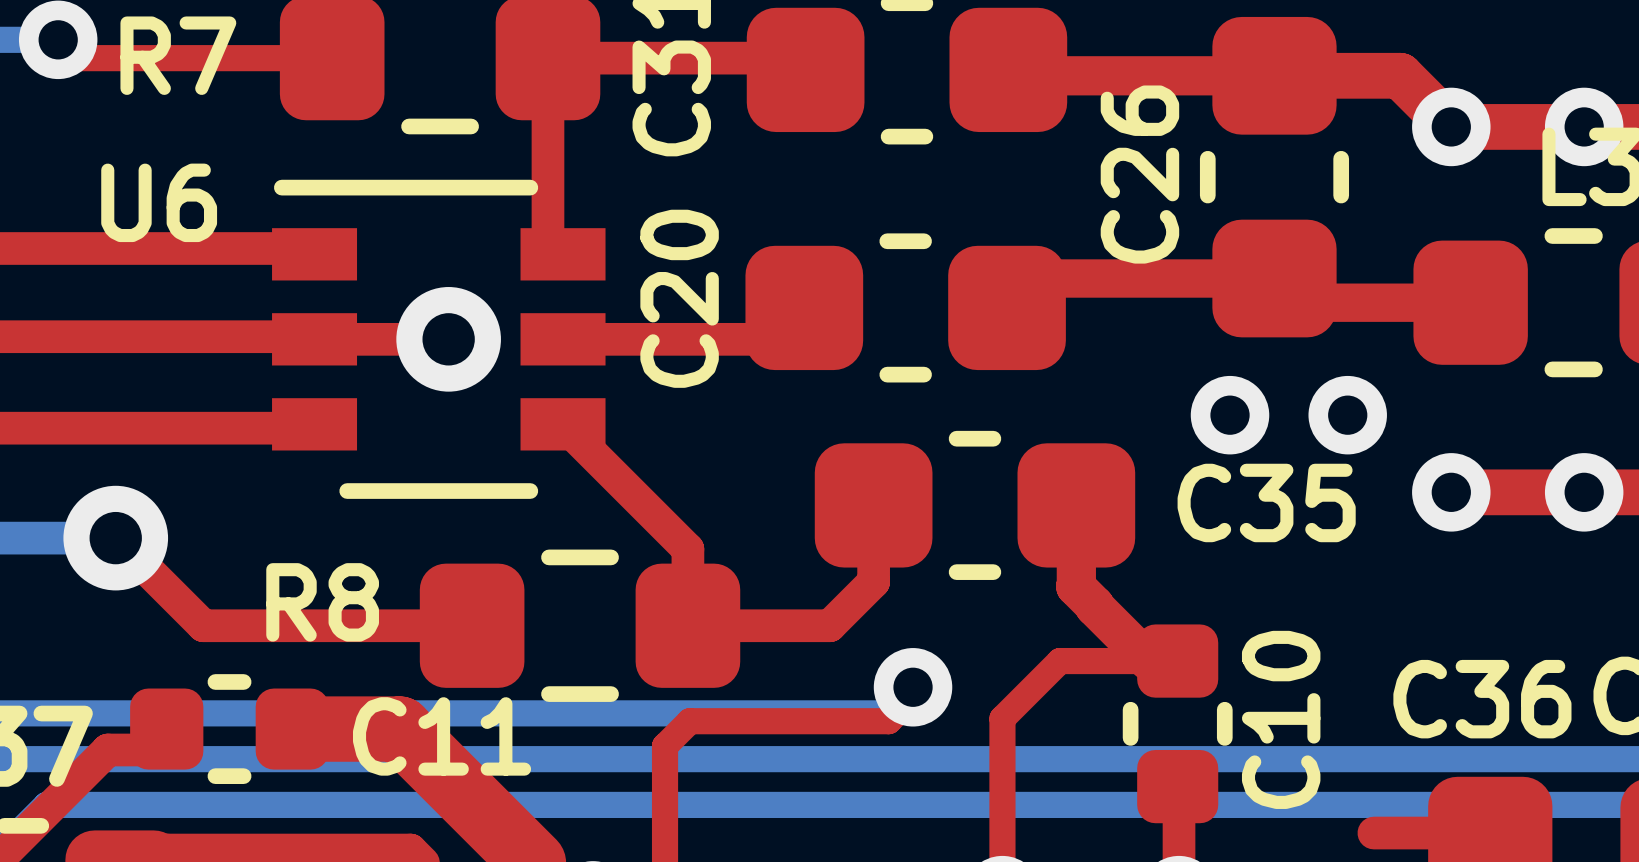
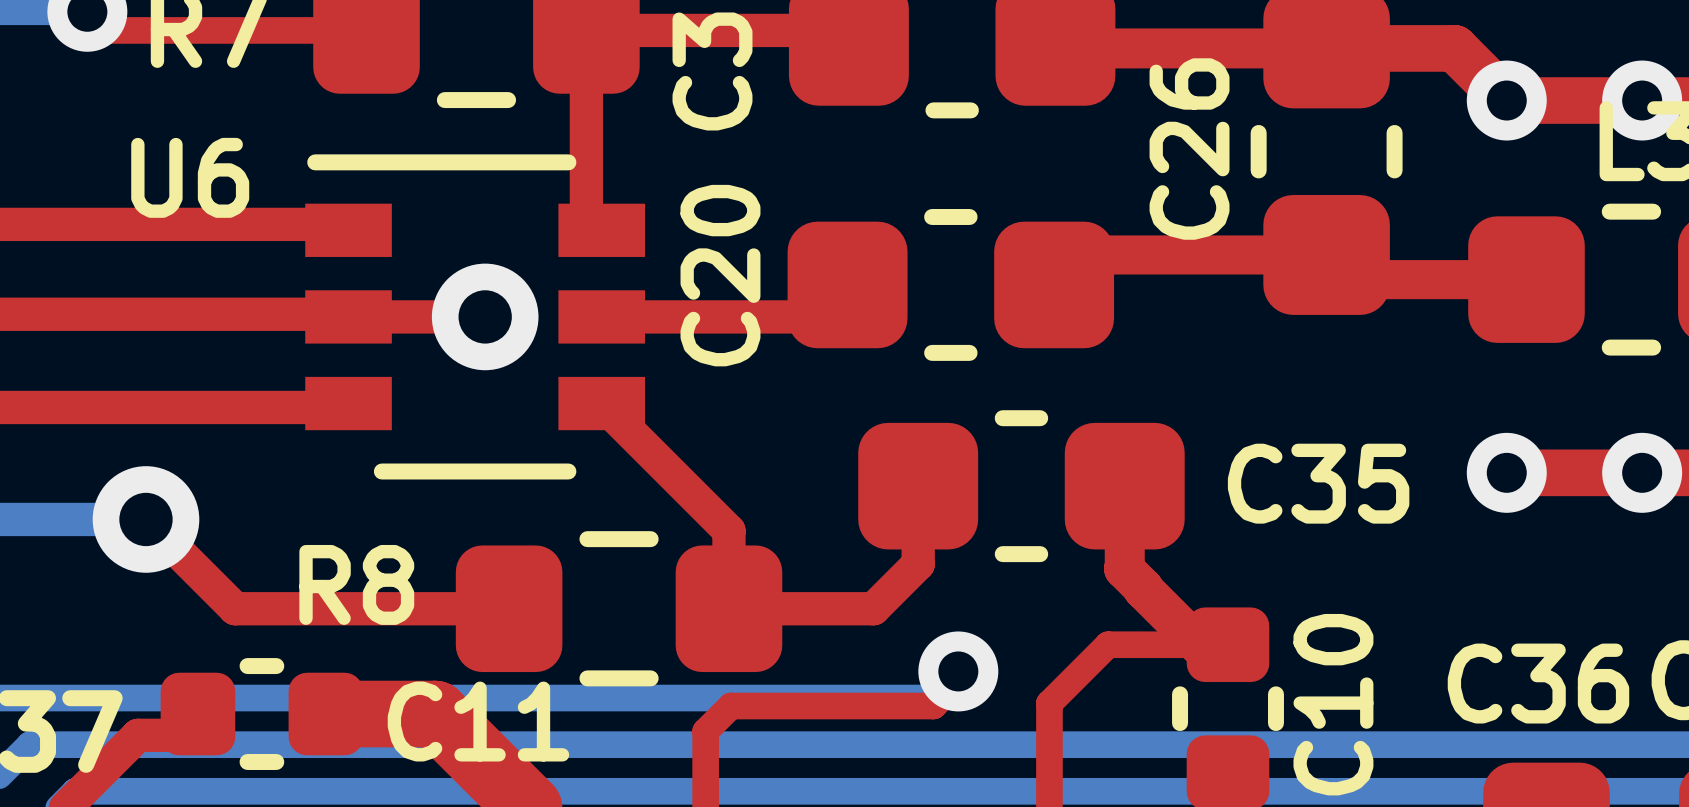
via: (1230, 415) -> none
via: (1347, 415) -> none

